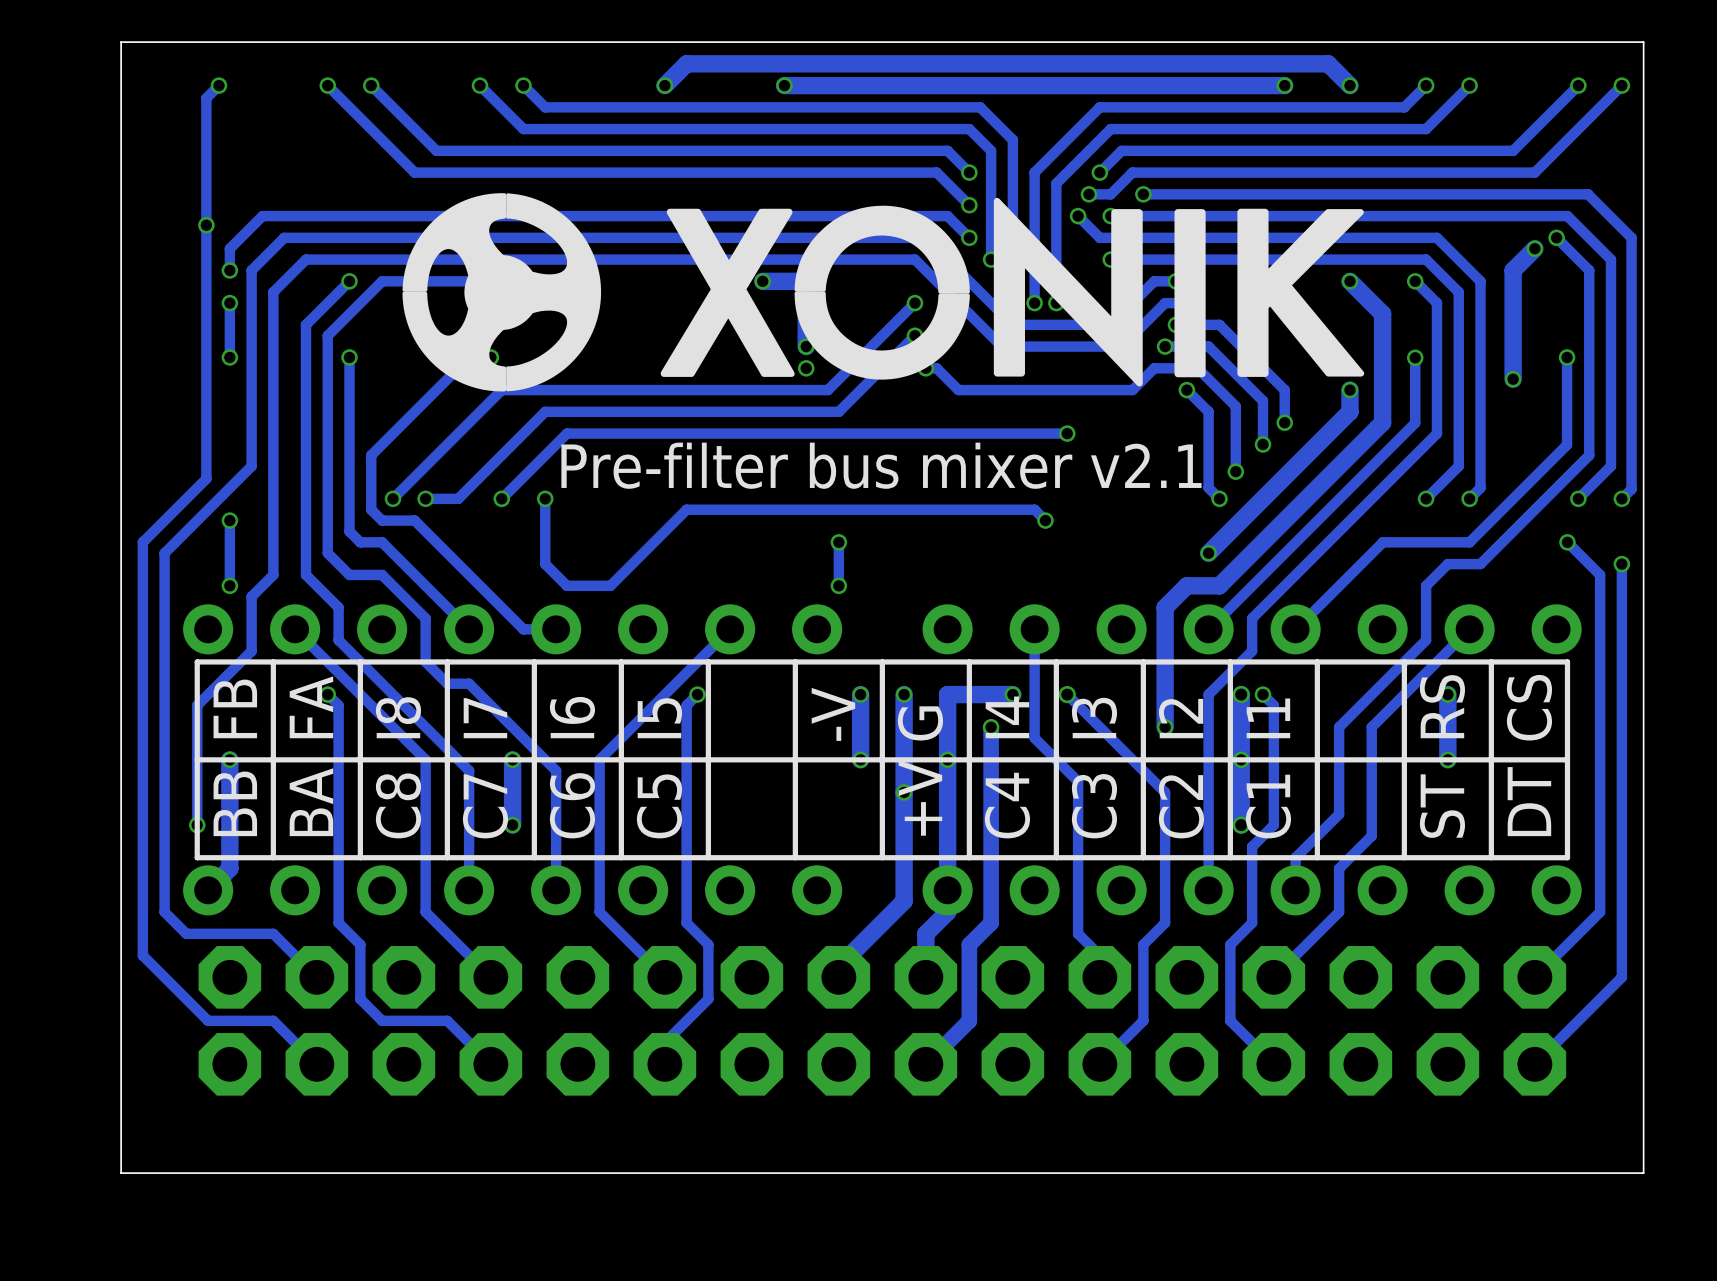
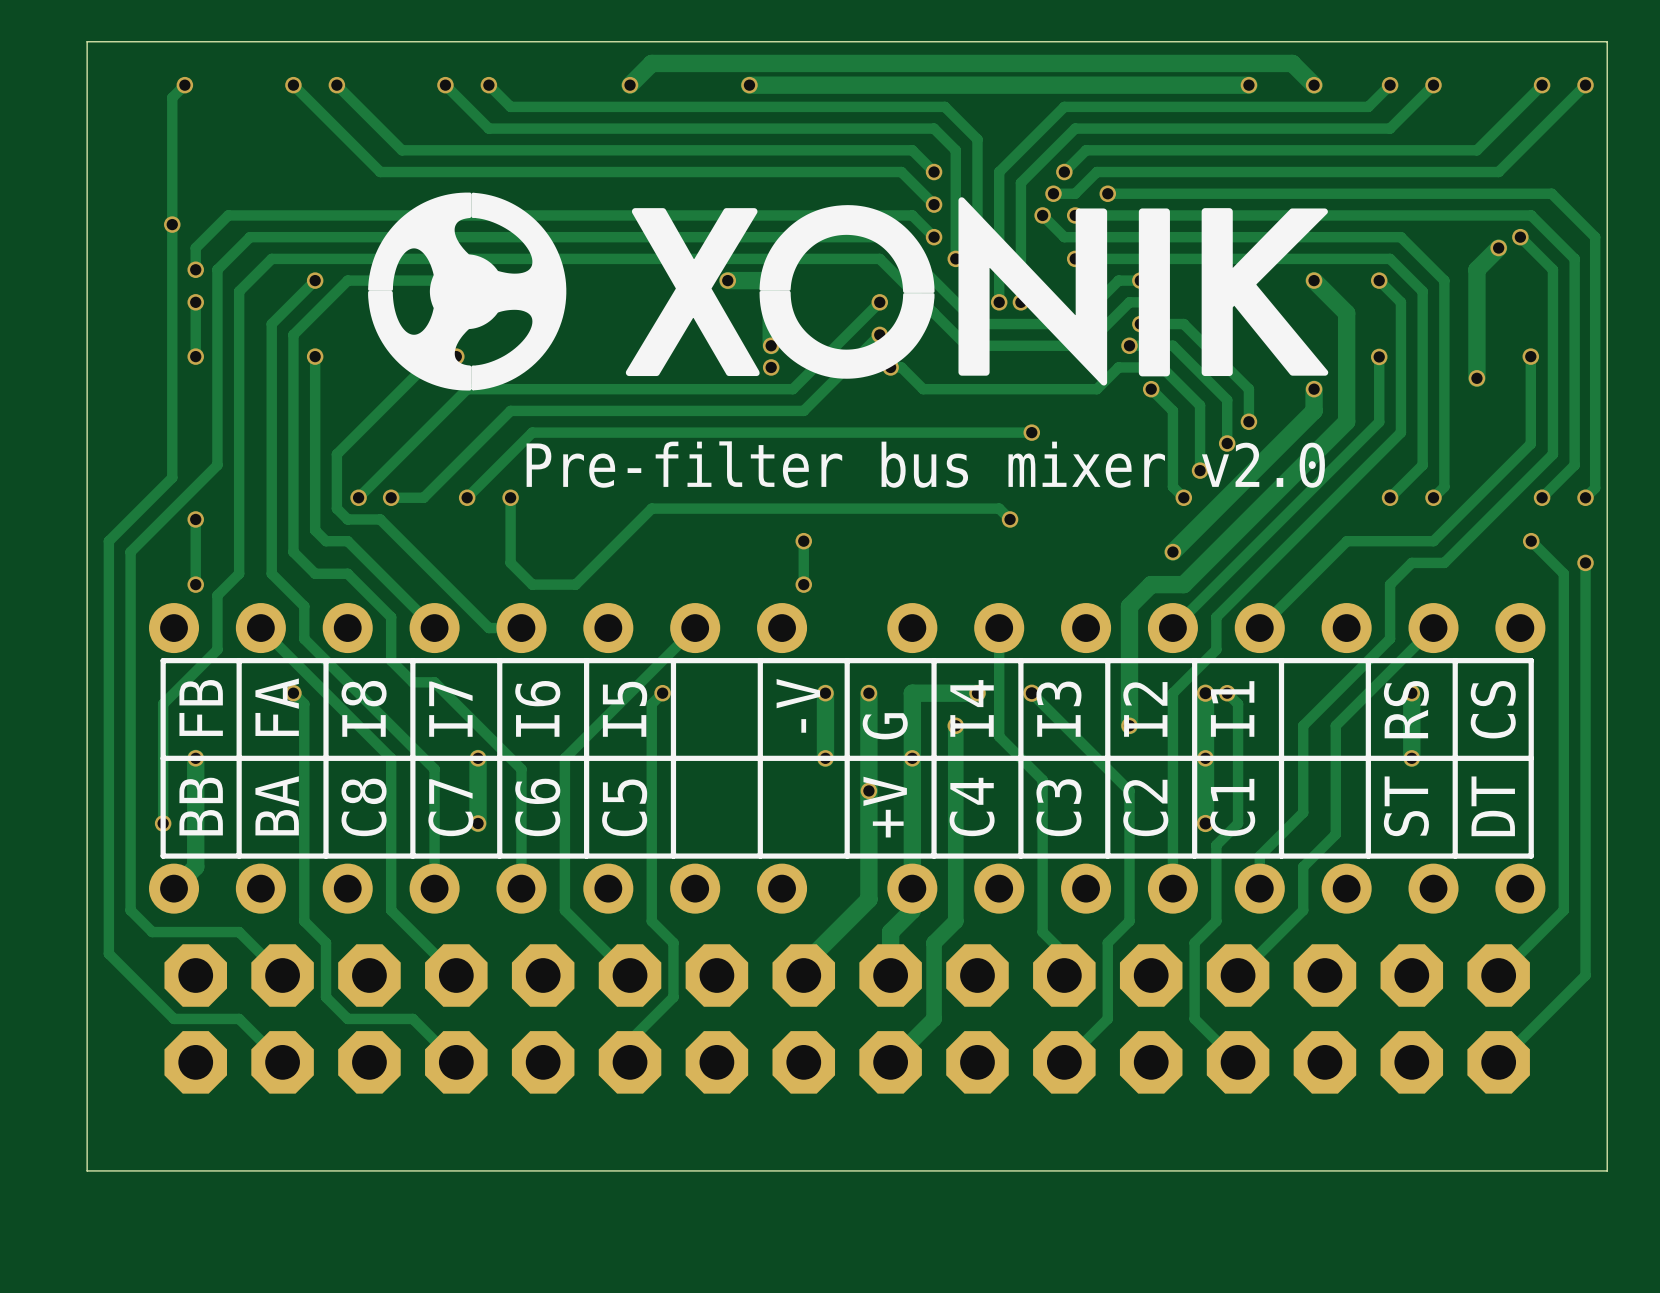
text: Pre-filter bus mixer v2.1 (881, 465) -> Pre-filter bus mixer v2.0 (925, 464)

